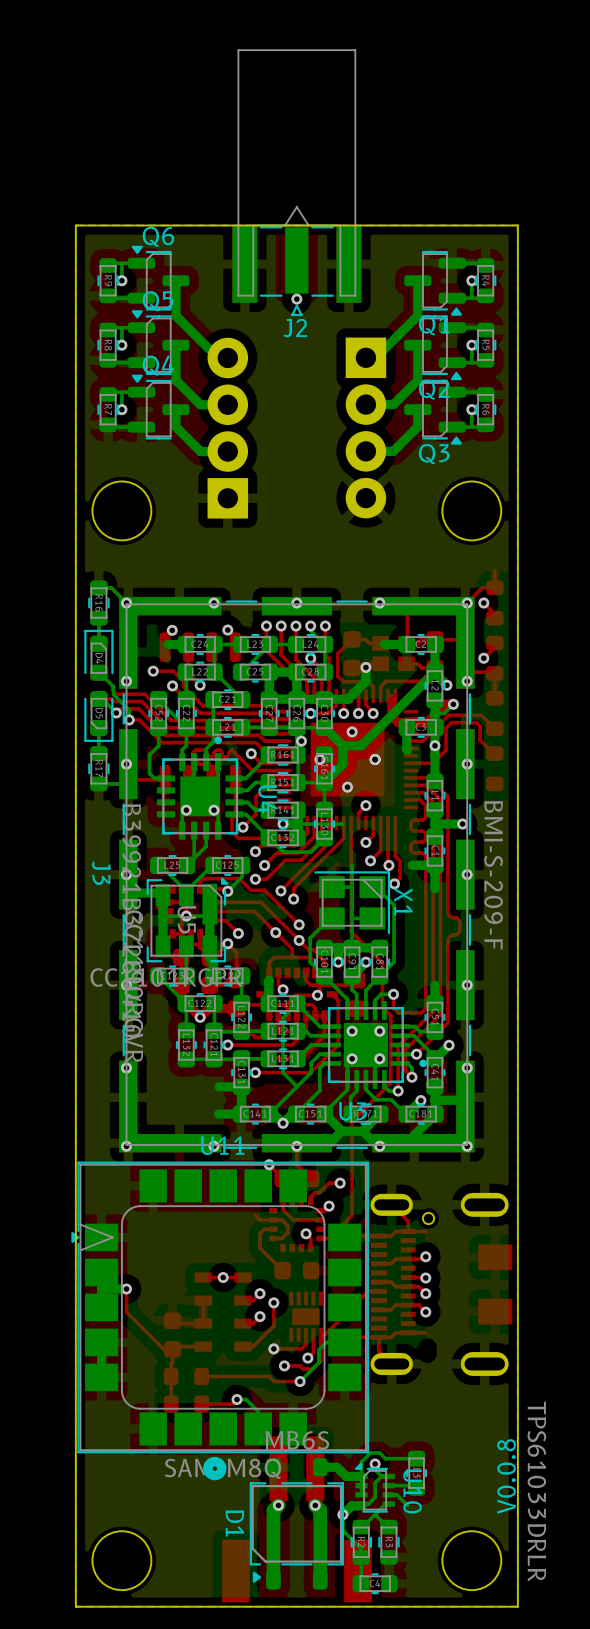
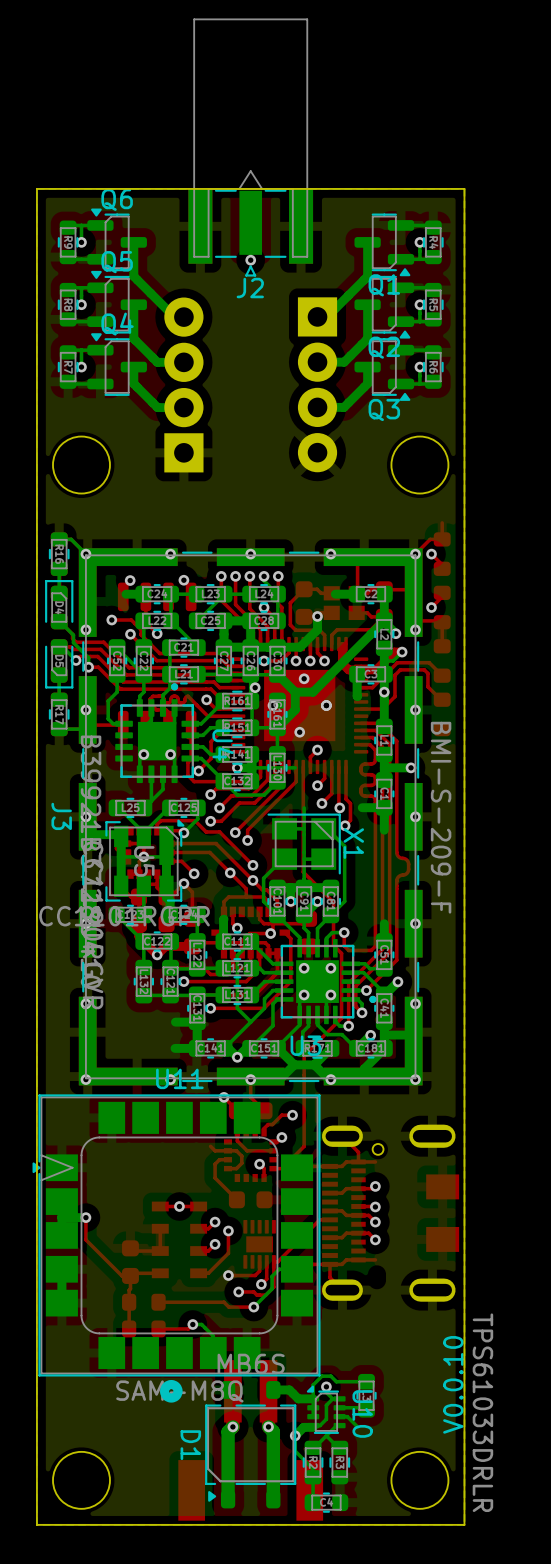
text: V0.0.8 (506, 1476) -> V0.0.10 (453, 1384)

